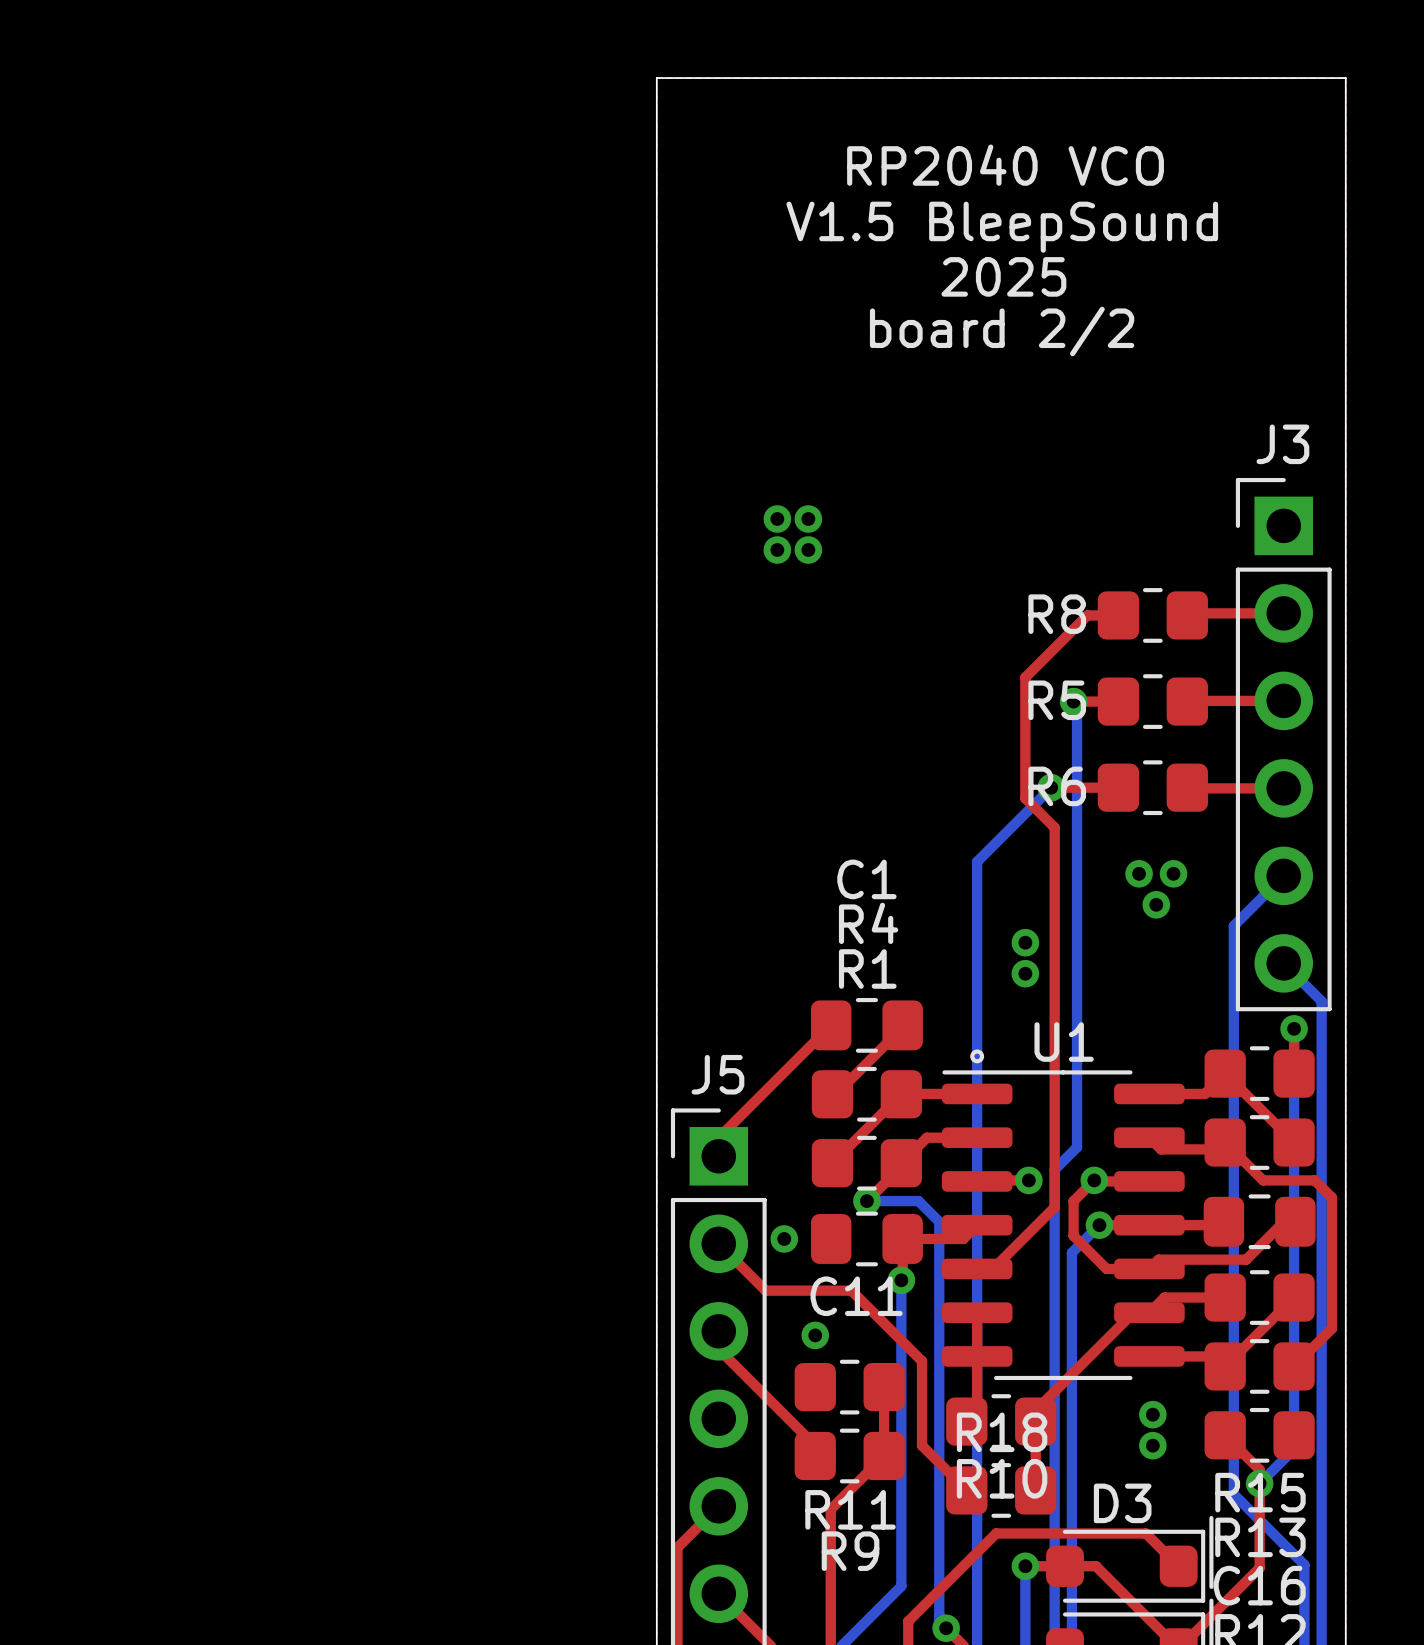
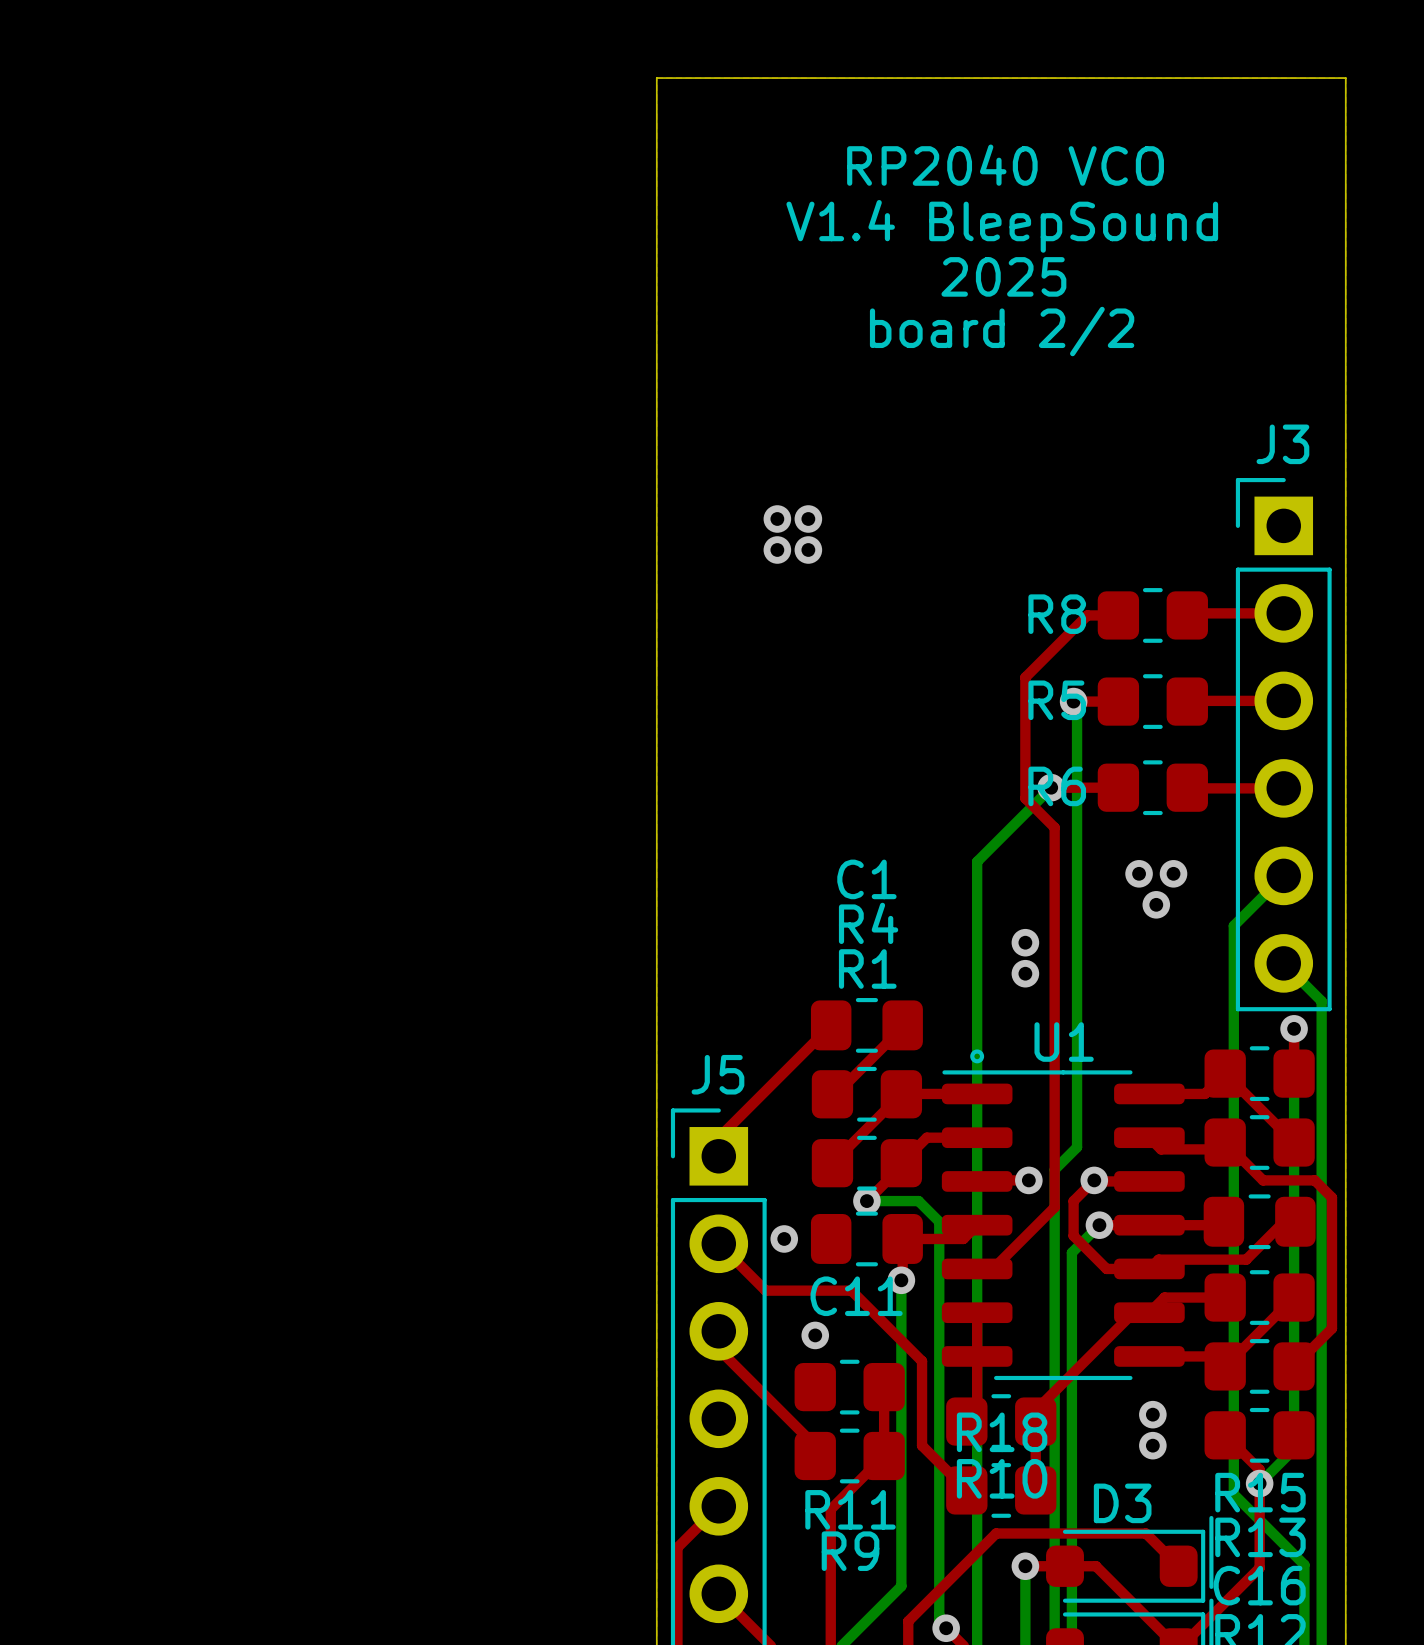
text: V1.5 BleepSound (1002, 227) -> V1.4 BleepSound (1002, 226)

